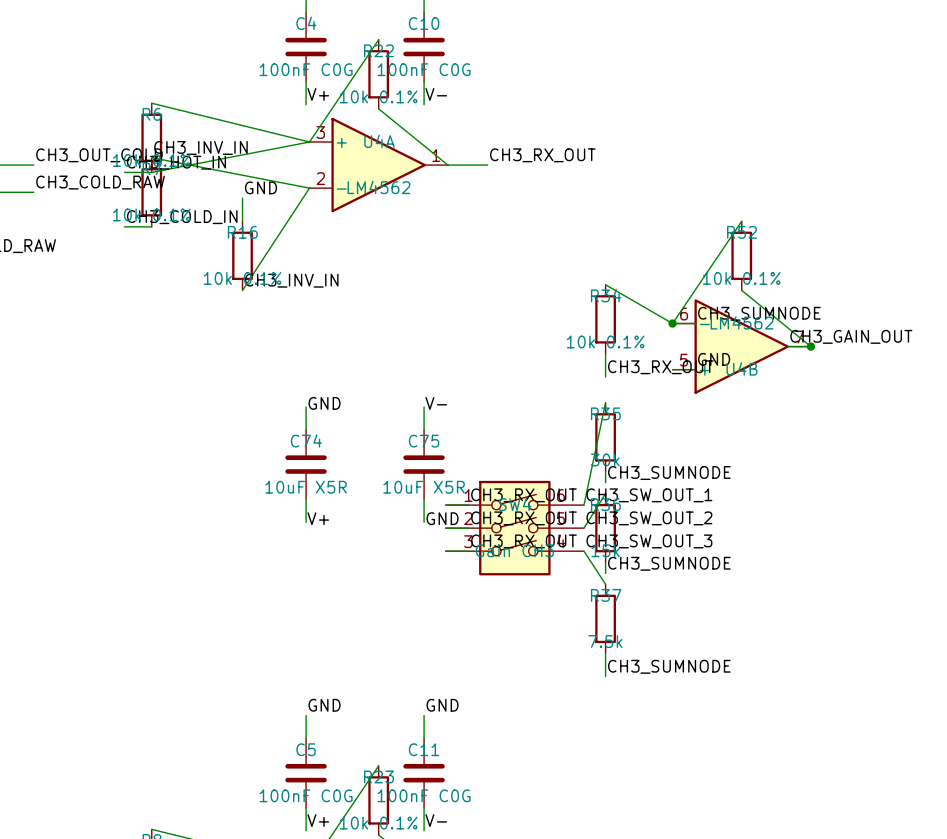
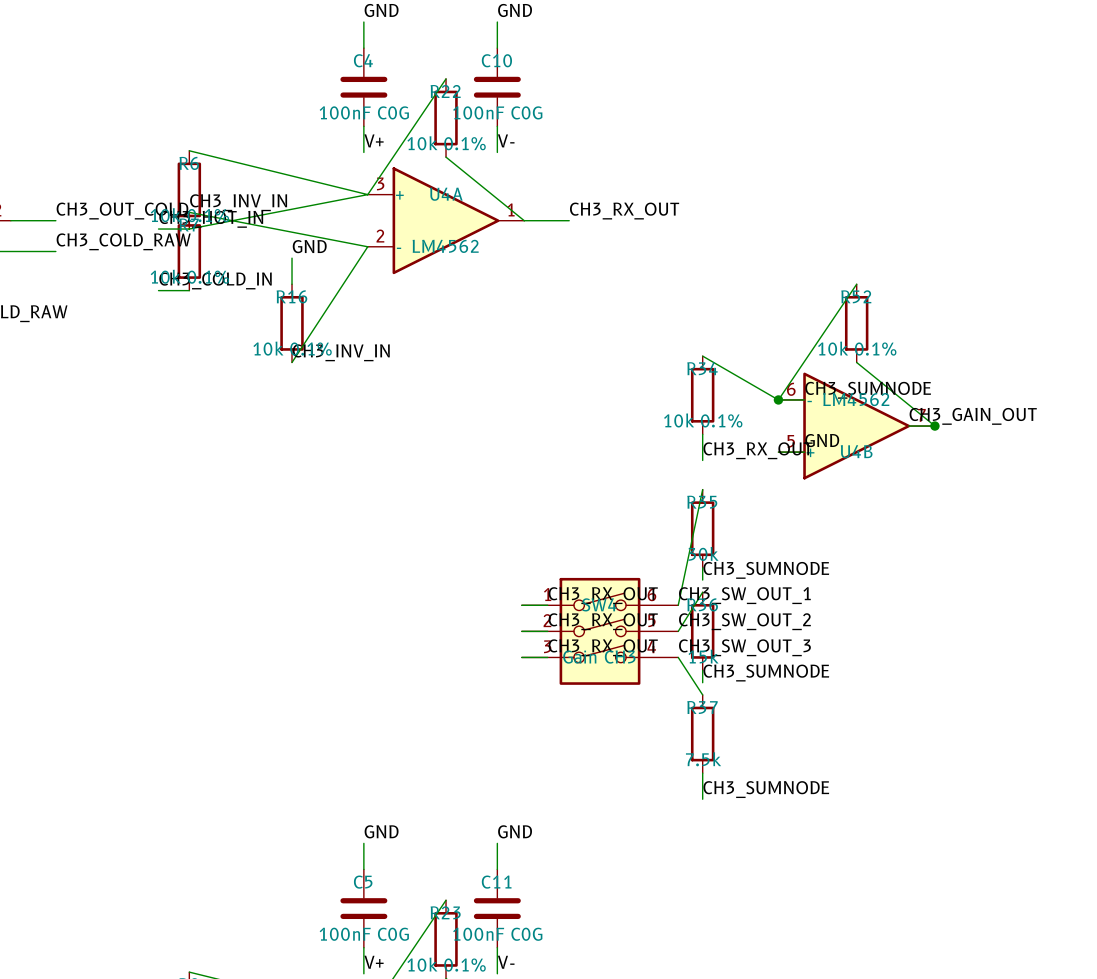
label: GND (324, 403) -> none
label: V- (436, 403) -> none
wire: (306, 406) (306, 430) -> none
wire: (424, 406) (424, 430) -> none
C74: 10uF X5R (306, 464) -> none
C75: 10uF X5R (424, 464) -> none
wire: (306, 499) (306, 522) -> none
wire: (424, 499) (424, 522) -> none
label: V+ (318, 518) -> none
label: GND (442, 518) -> none

